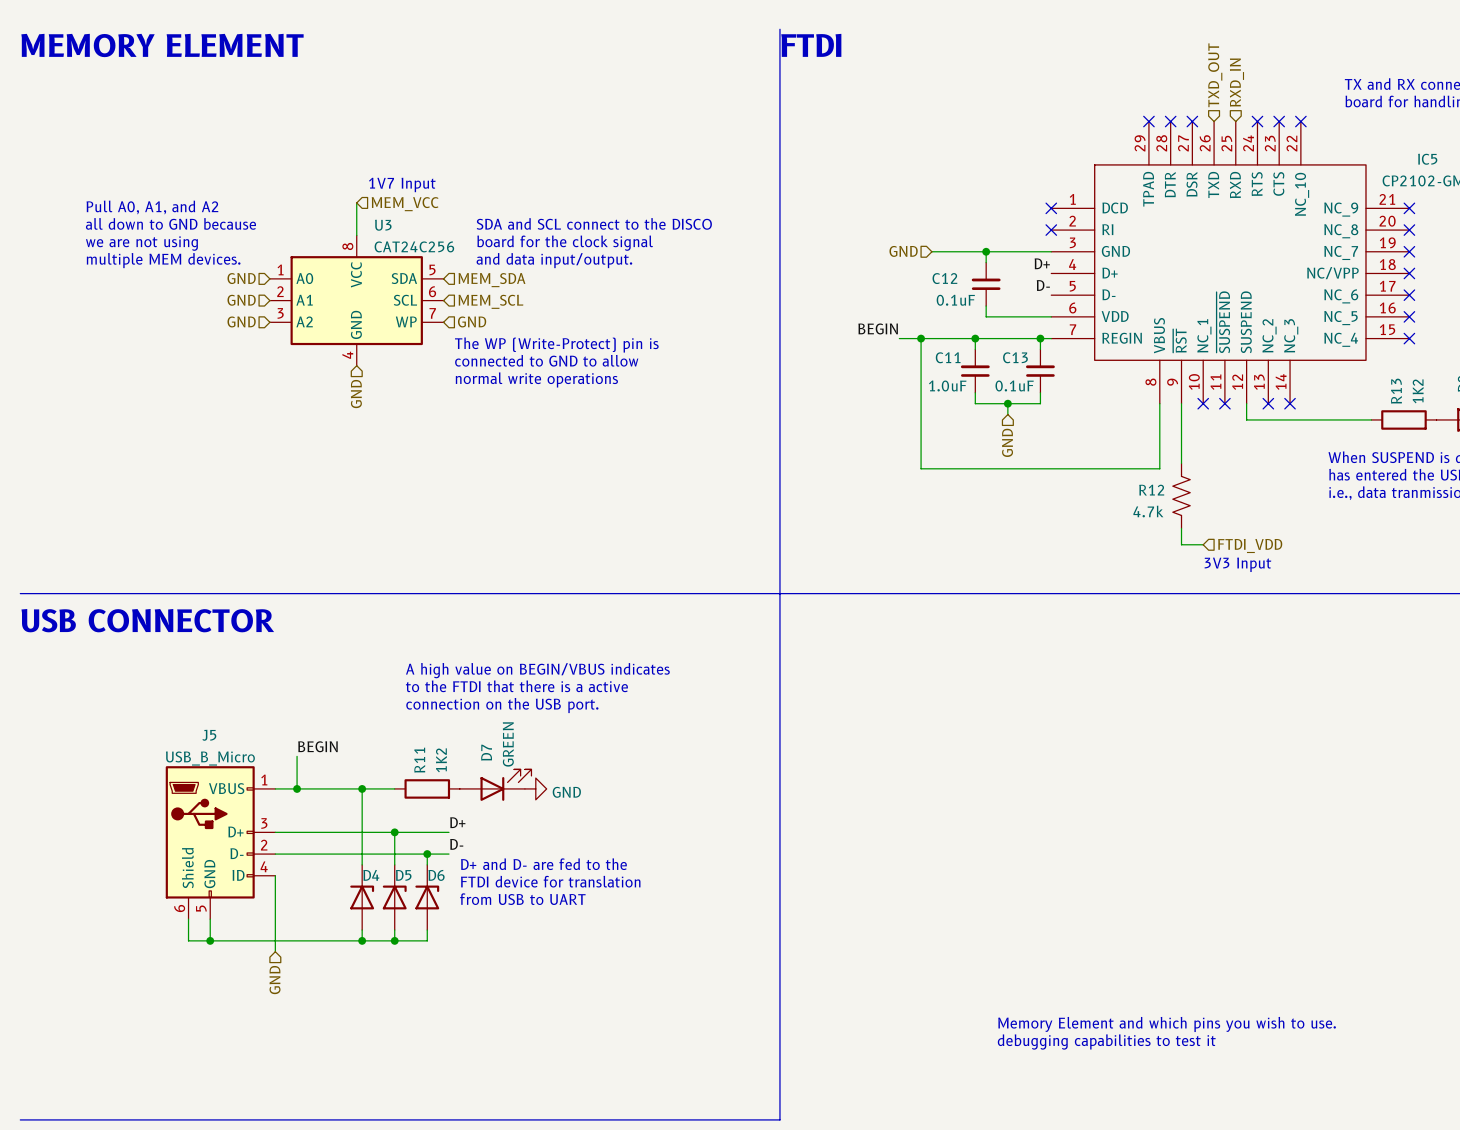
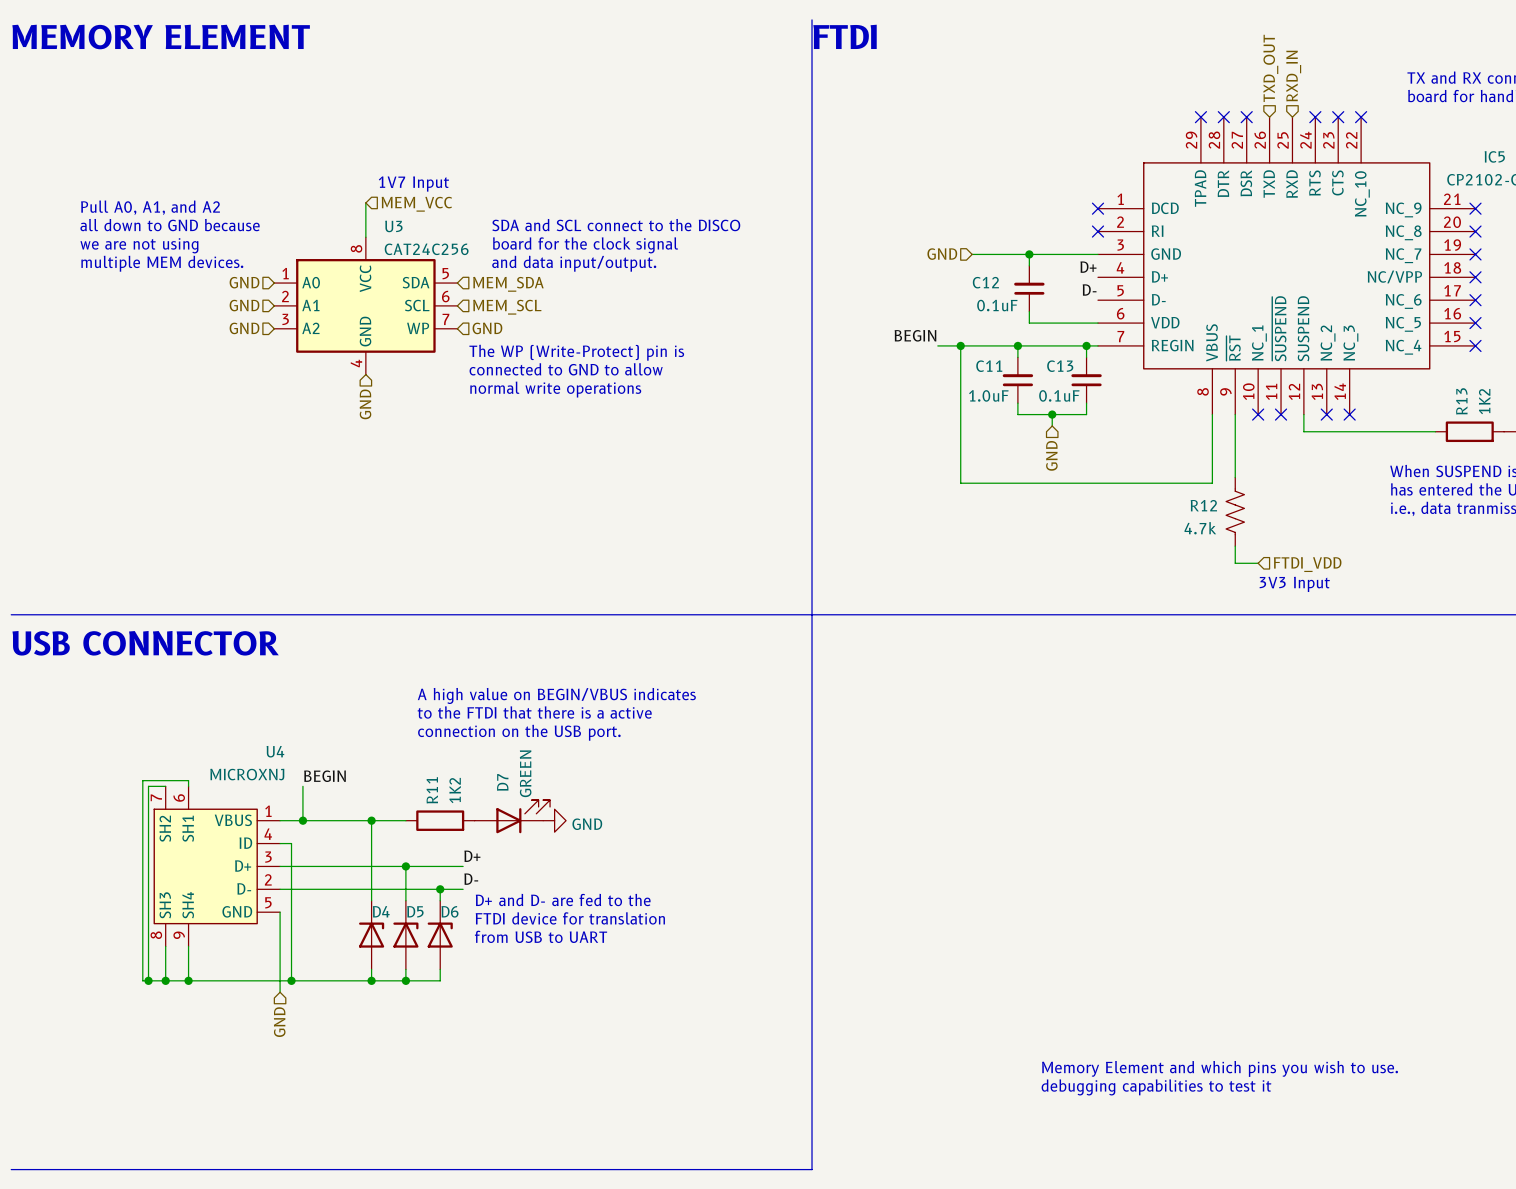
wire: none -> (165, 786) (148, 786) (148, 980)
wire: none -> (188, 786) (188, 780) (142, 780) (142, 980) (188, 980)
wire: none -> (280, 843) (291, 843) (291, 980)
U4: none -> MICROXNJ (216, 866)
J5: USB_B_Micro (220, 842) -> none
wire: none -> (165, 946) (165, 980)
wire: (210, 919) (210, 940) -> none
junction: none -> (148, 980)
junction: none -> (165, 980)
junction: none -> (188, 980)
junction: (210, 940) -> none
junction: none -> (291, 980)

